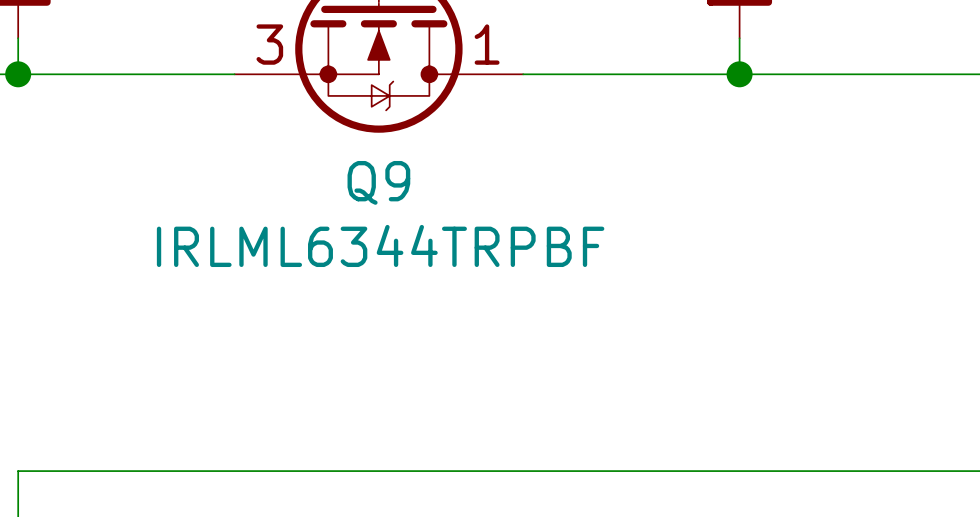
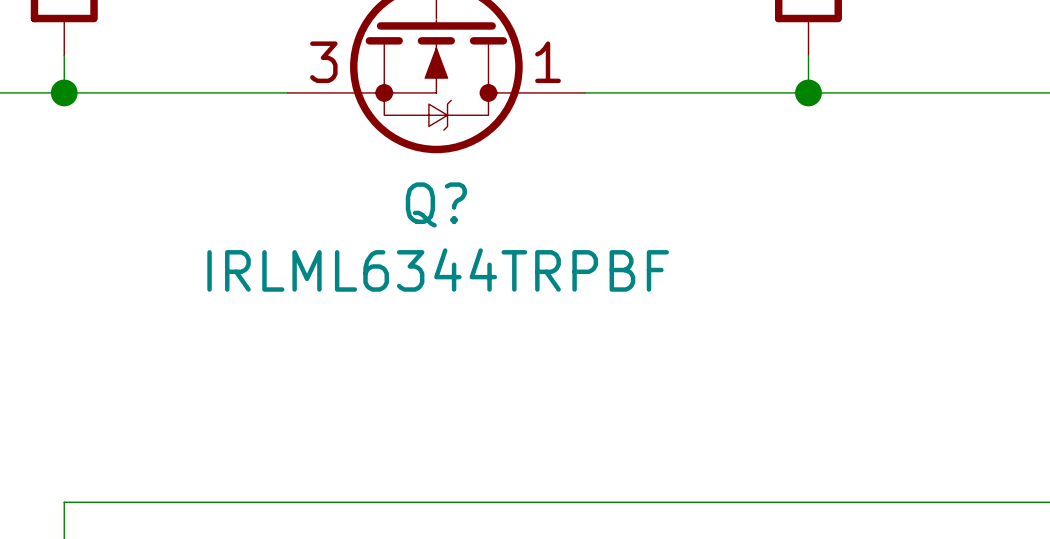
Q9 name: Q9 (378, 182) -> Q? (436, 204)

